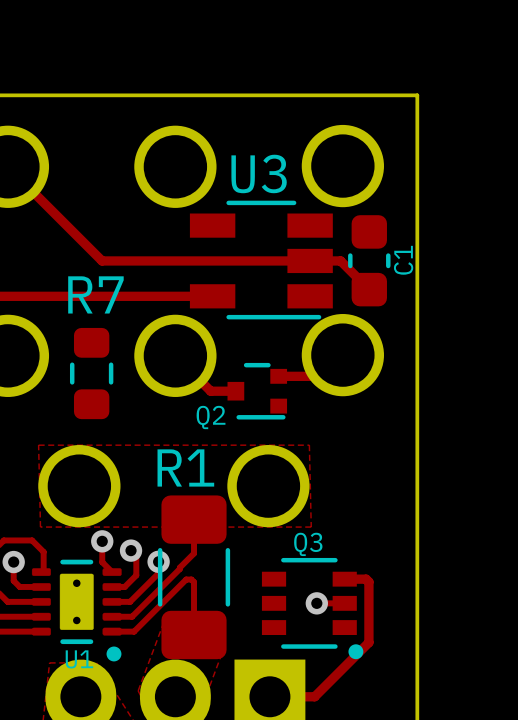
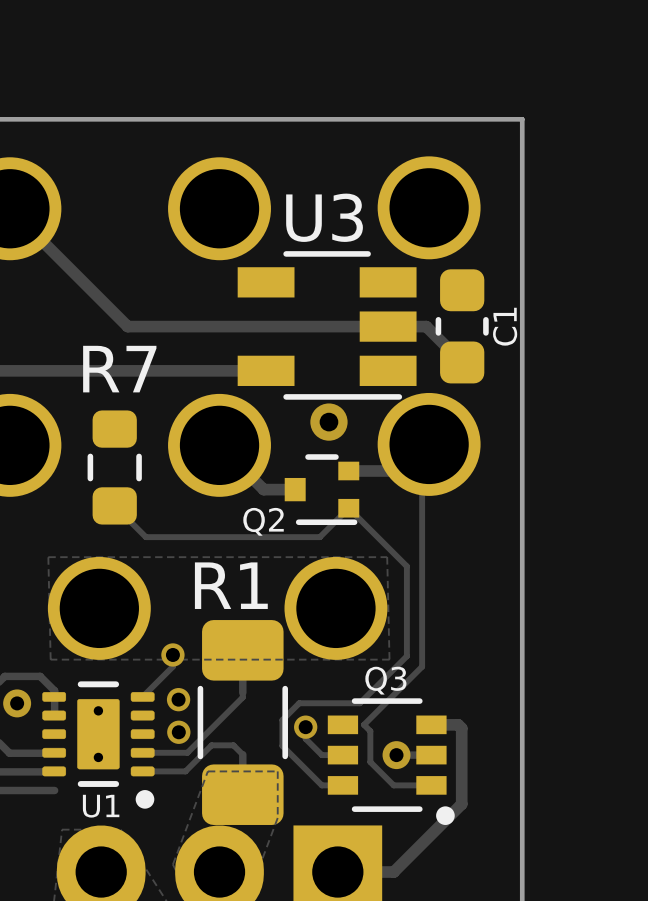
via: none -> (328, 422)
track: none -> (429, 444) (422, 451) (422, 666) (364, 724) (370, 731) (370, 762) (393, 785) (431, 785)
track: none -> (114, 505) (145, 537) (319, 537) (348, 508) (406, 566) (406, 656) (359, 703) (299, 703) (282, 720) (282, 745) (321, 785) (342, 785)
track: none -> (172, 654) (172, 666) (142, 696)
via: none -> (172, 654)
track: (102, 541) (102, 562) (112, 572) -> none
via: (102, 541) -> none
track: (131, 550) (136, 554) (136, 575) (124, 586) (112, 586) -> none
via: (131, 550) -> none
track: (194, 553) (132, 616) (114, 616) -> (242, 692) (242, 697) (187, 752) (142, 752)
via: none -> (178, 699)
track: (158, 561) (158, 573) (130, 601) (112, 601) -> none
via: (158, 561) -> none
track: (13, 562) (13, 580) (19, 586) (43, 586) -> none
track: none -> (305, 727) (305, 738) (321, 755) (342, 755)
via: none -> (305, 727)
via: none -> (178, 732)
track: (194, 602) (194, 582) (191, 579) (186, 579) (134, 631) (114, 631) -> (242, 754) (233, 745) (211, 745) (185, 771) (142, 771)
U1 position: (76, 610) -> (98, 745)

